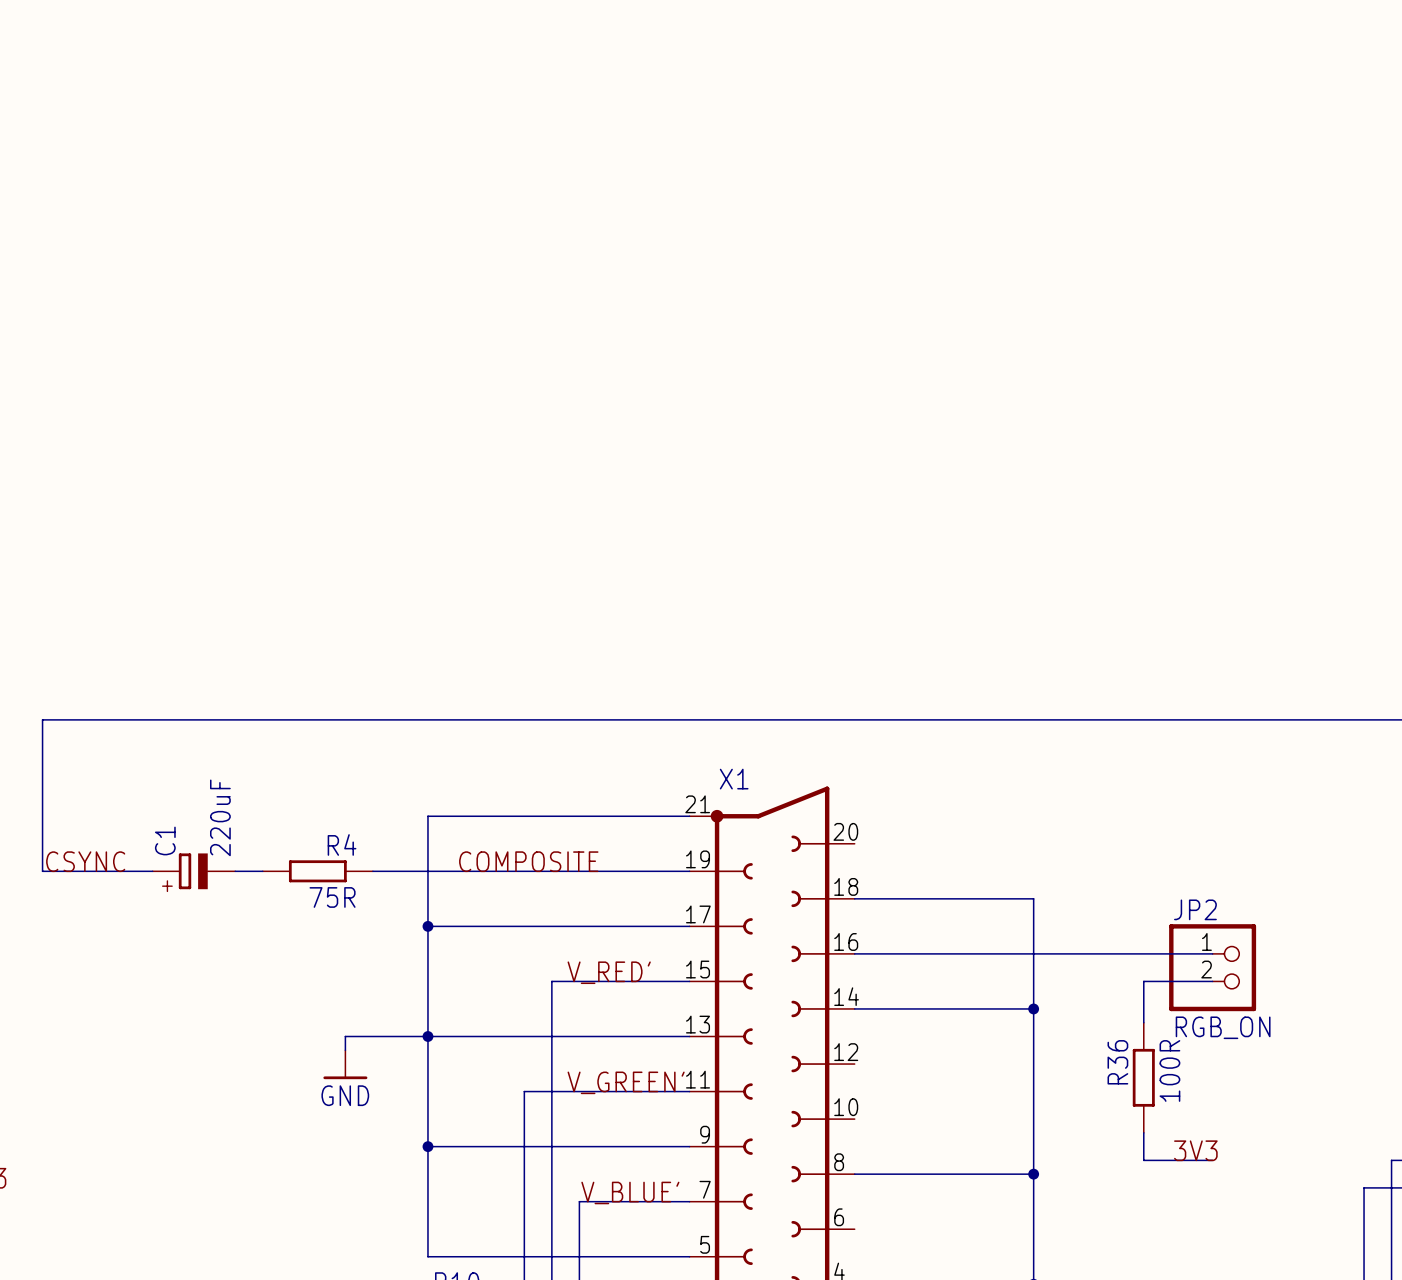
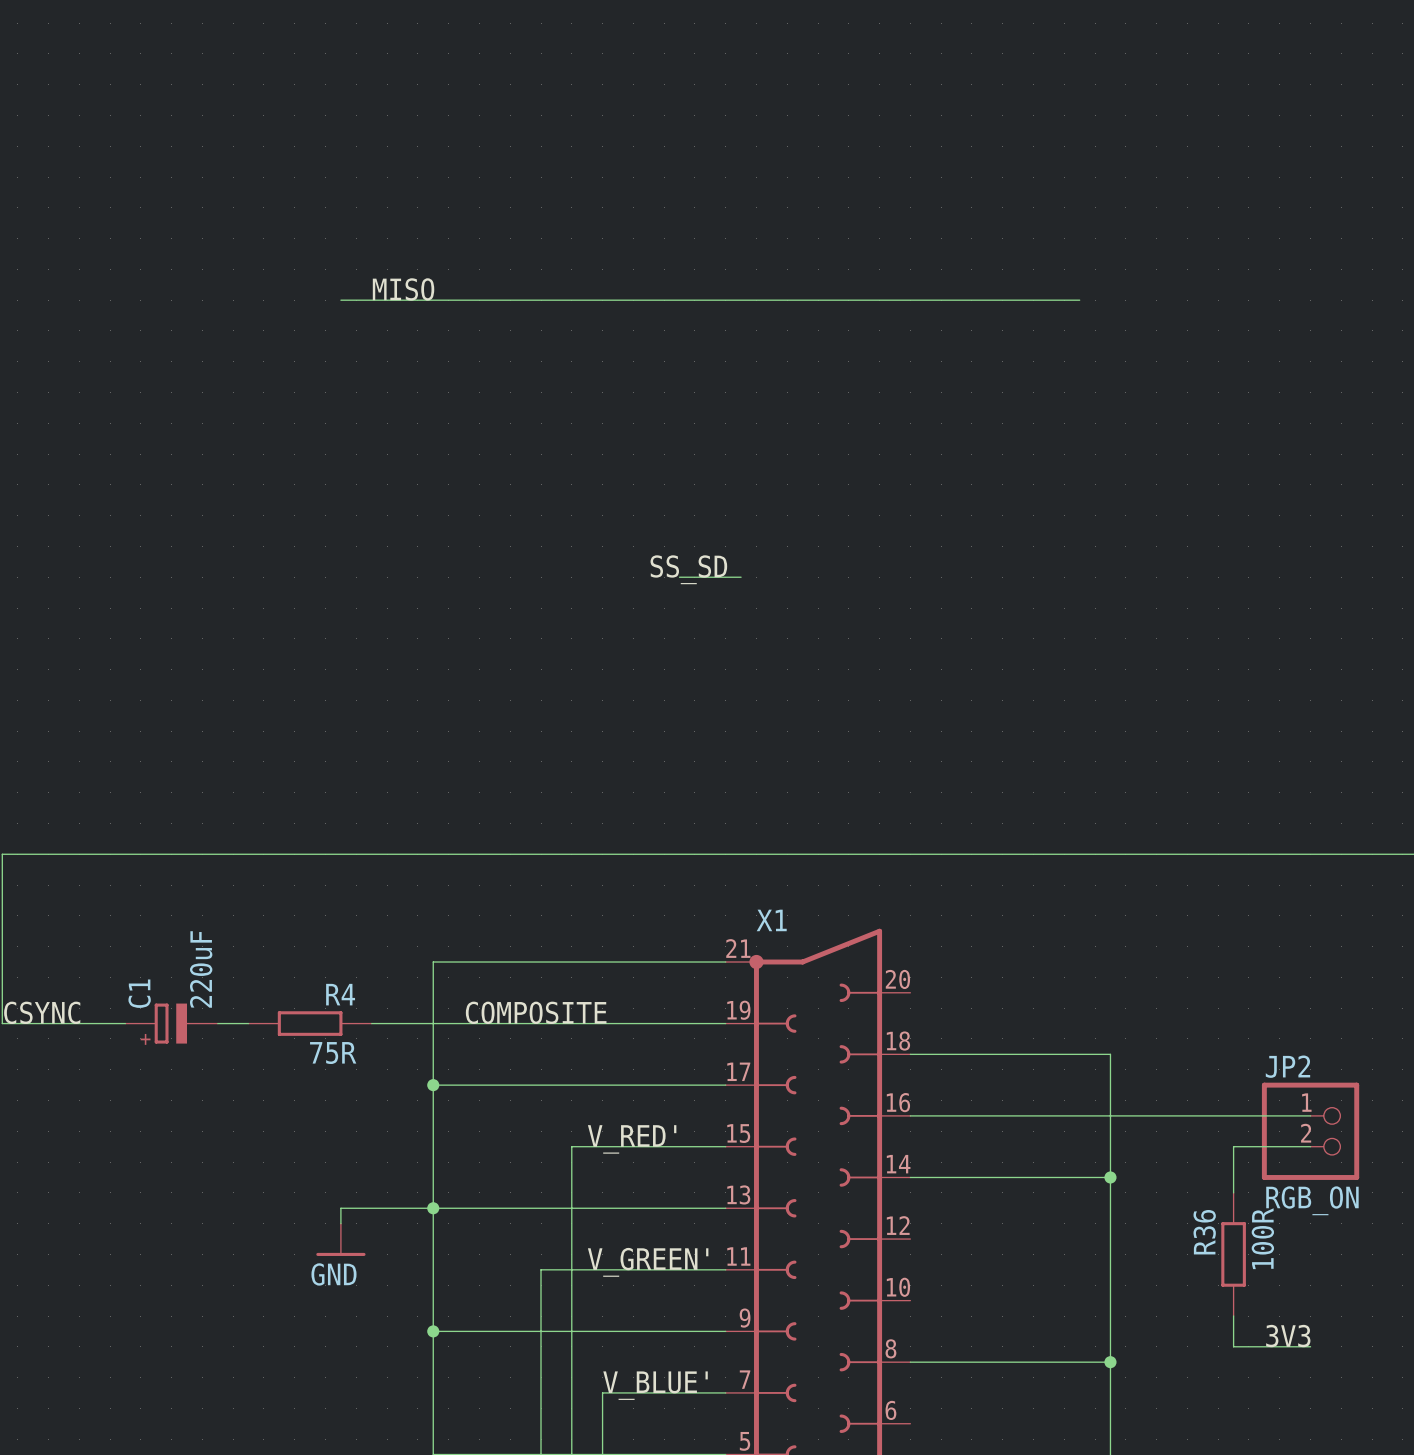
label: none -> MISO (403, 289)
wire: none -> (340, 300) (1079, 300)
label: none -> SS_SD (688, 569)
wire: none -> (679, 577) (741, 577)

